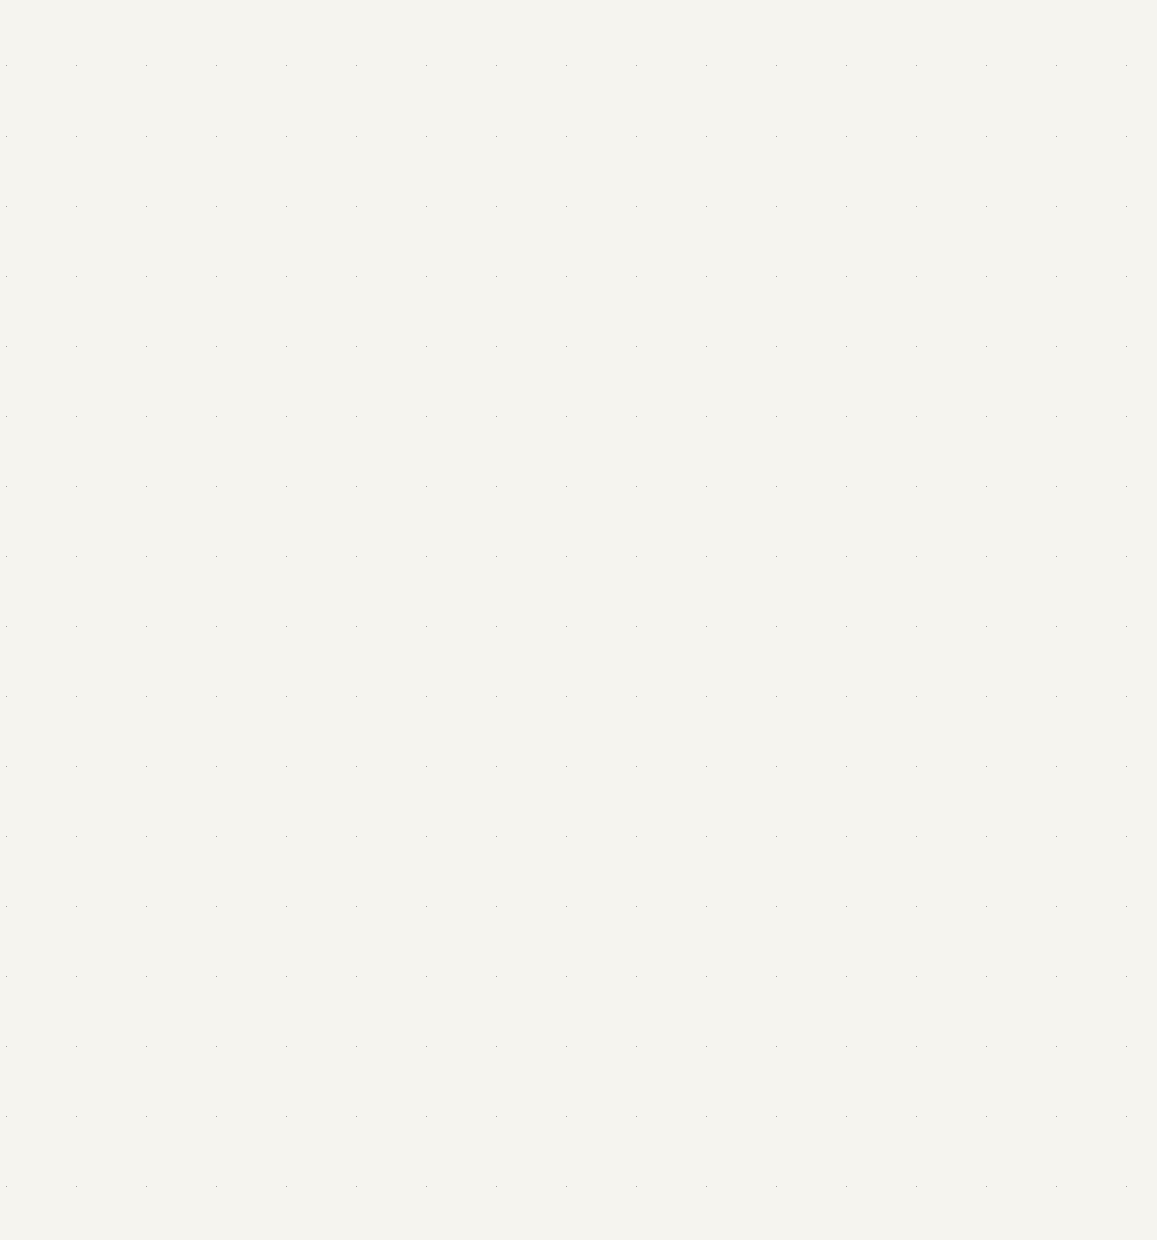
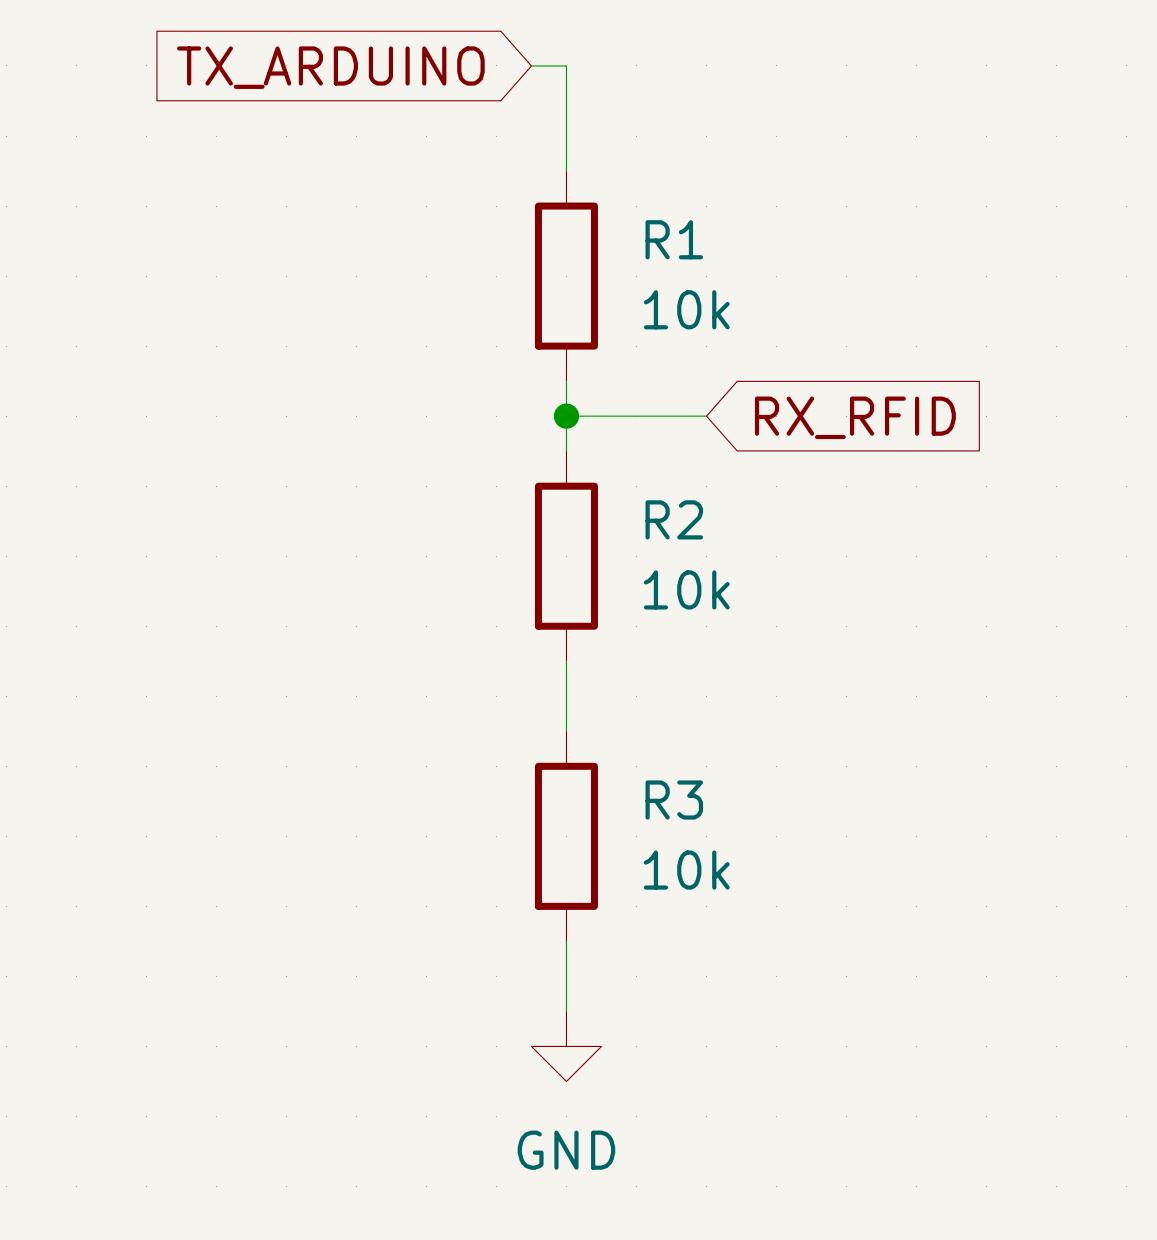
wire: none -> (531, 65) (566, 65) (566, 171)
global label: none -> TX_ARDUINO (330, 67)
R1: none -> 10k (566, 276)
wire: none -> (566, 381) (566, 451)
wire: none -> (566, 416) (706, 416)
junction: none -> (566, 416)
global label: none -> RX_RFID (855, 417)
R2: none -> 10k (566, 556)
wire: none -> (566, 661) (566, 731)
R3: none -> 10k (566, 836)
wire: none -> (566, 941) (566, 1011)
power symbol: none -> GND (566, 1046)

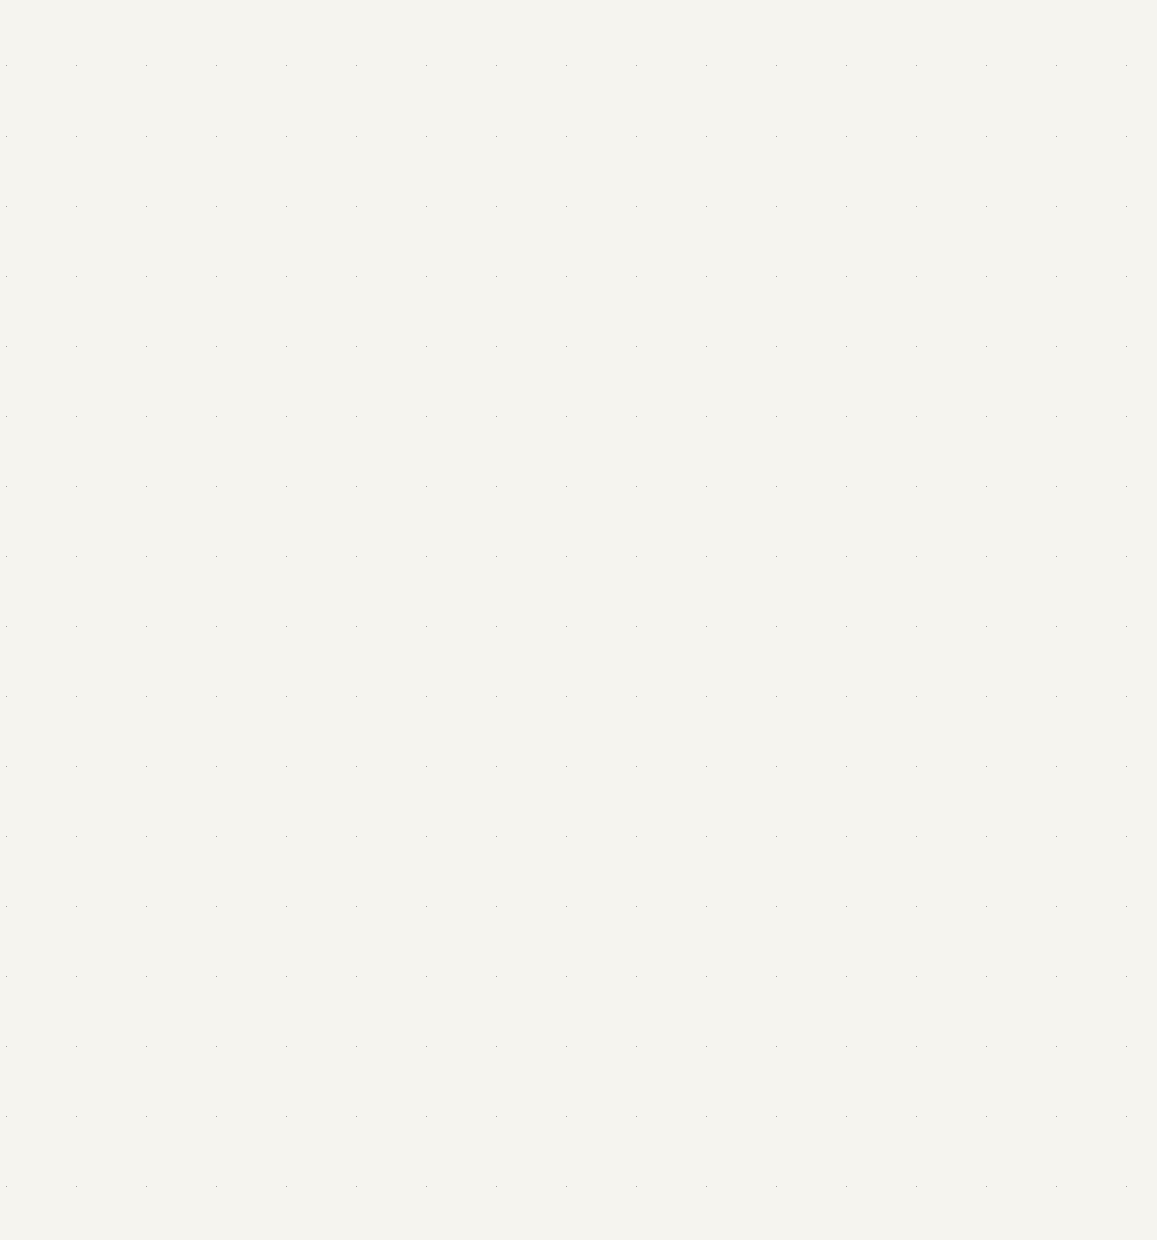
wire: (531, 65) (566, 65) (566, 171) -> none
global label: TX_ARDUINO (330, 67) -> none
R1: 10k (566, 276) -> none
wire: (566, 381) (566, 451) -> none
wire: (566, 416) (706, 416) -> none
junction: (566, 416) -> none
global label: RX_RFID (855, 417) -> none
R2: 10k (566, 556) -> none
wire: (566, 661) (566, 731) -> none
R3: 10k (566, 836) -> none
wire: (566, 941) (566, 1011) -> none
power symbol: GND (566, 1046) -> none

